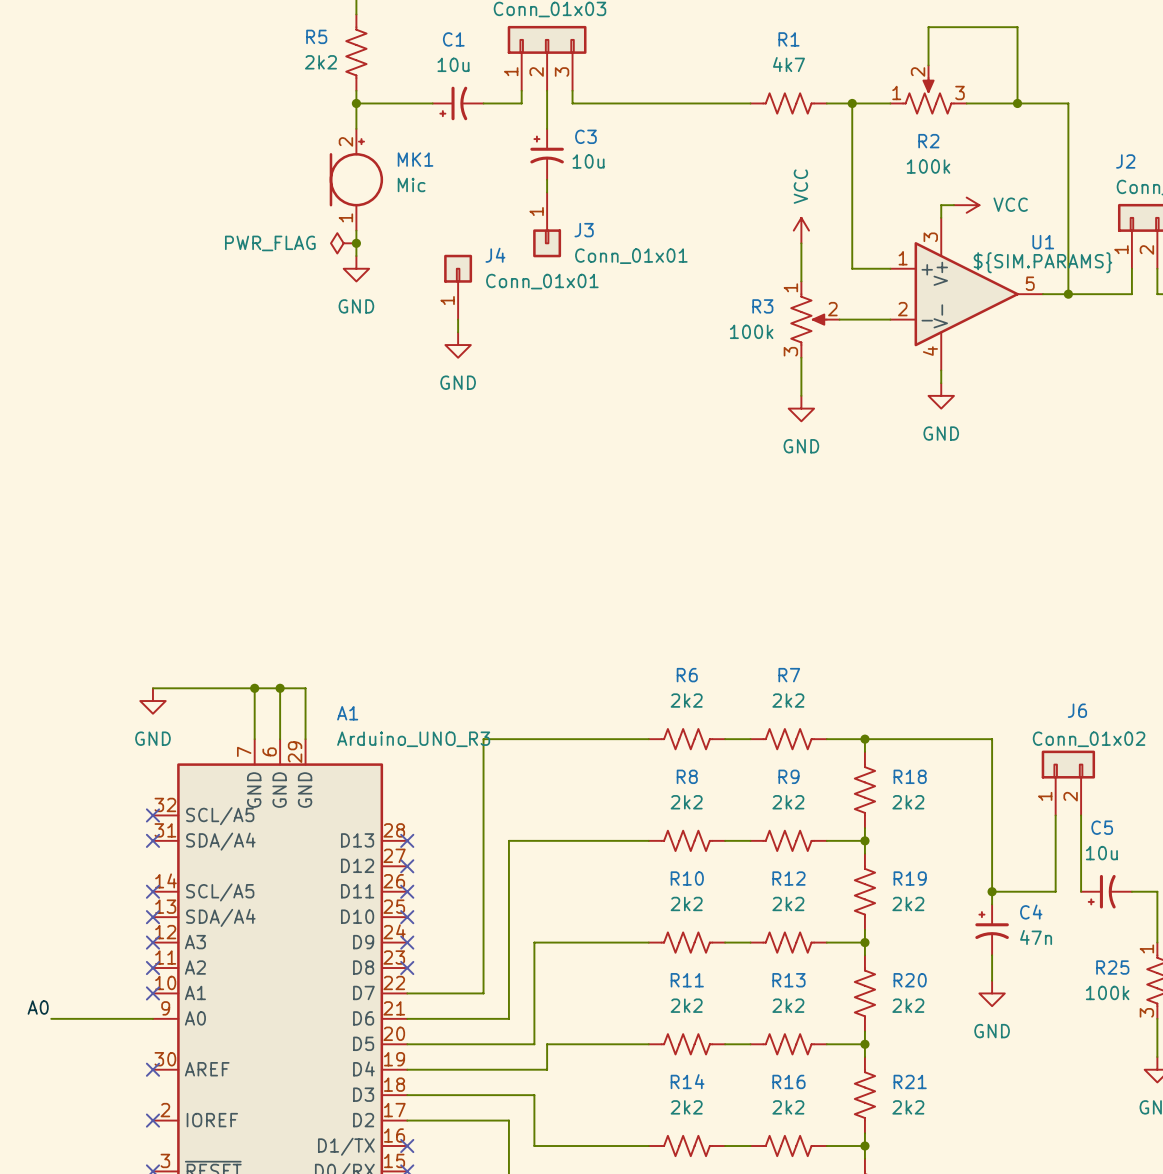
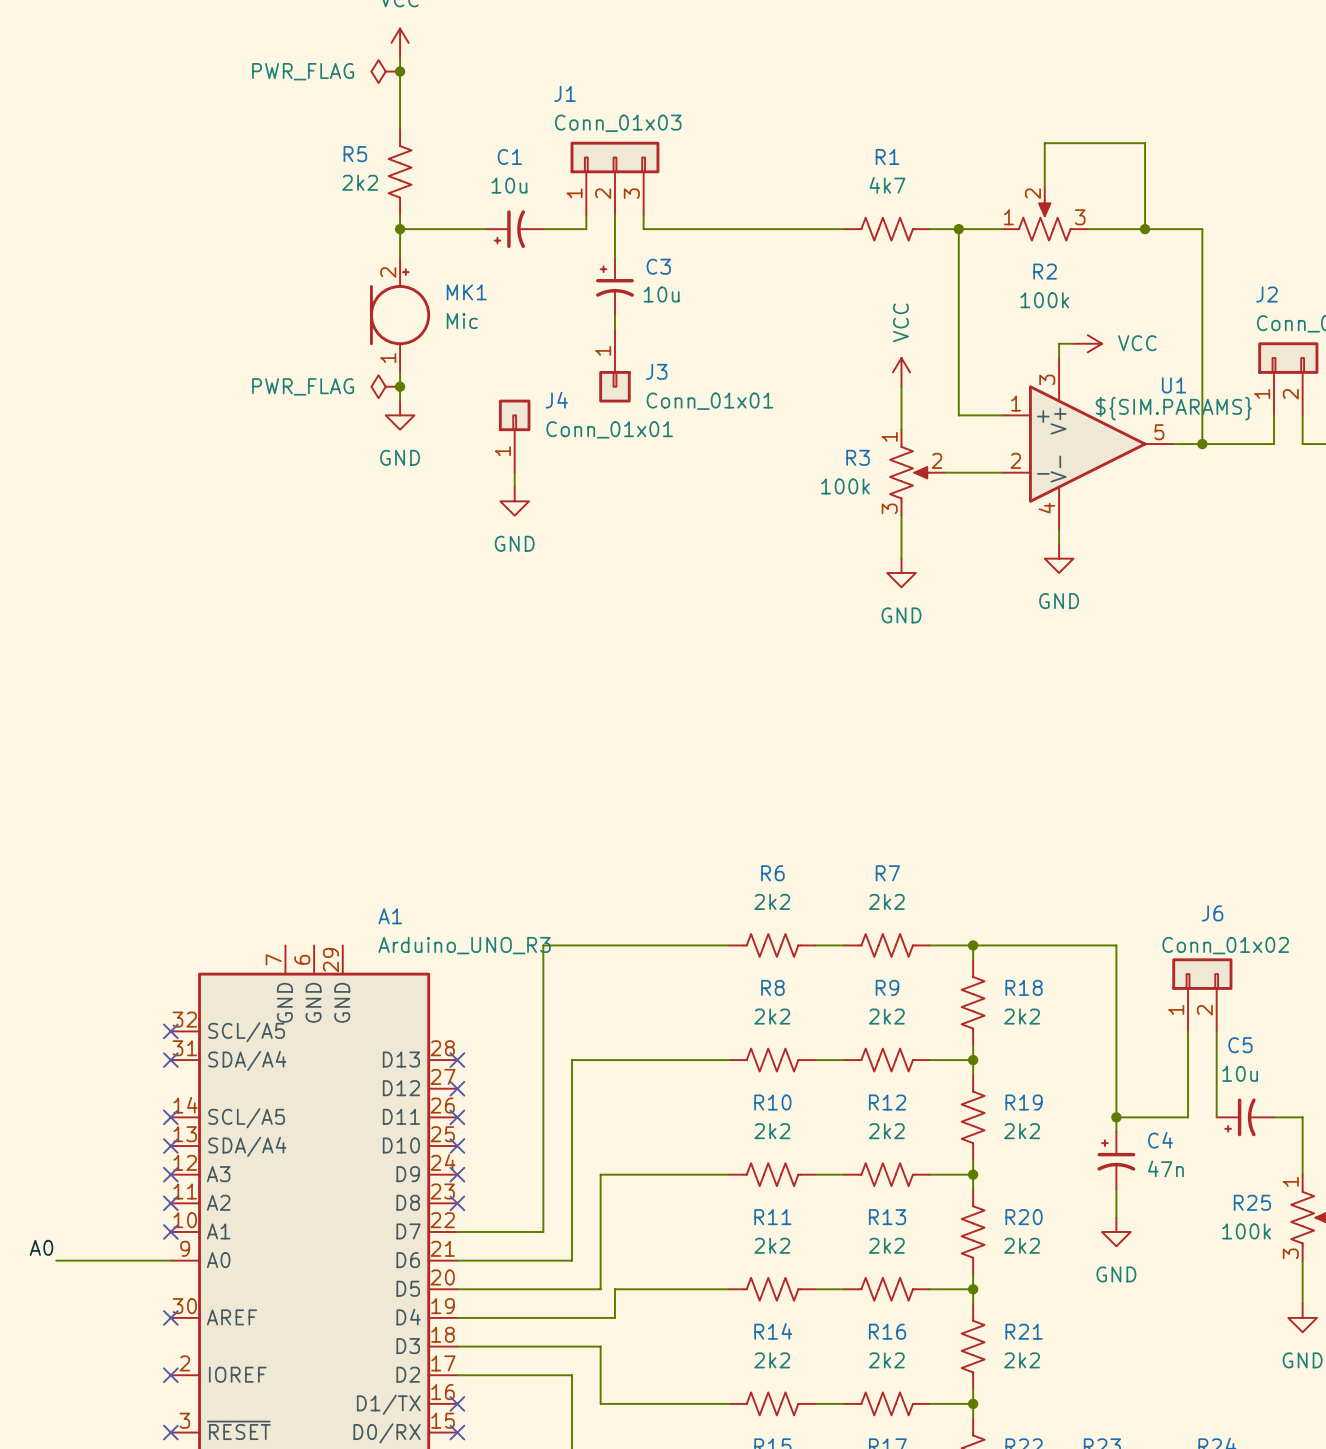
wire: (152, 688) (305, 688) (305, 739) -> none
wire: (254, 688) (254, 739) -> none
junction: (254, 688) -> none
wire: (280, 688) (280, 739) -> none
junction: (280, 688) -> none
power symbol: GND (152, 701) -> none

